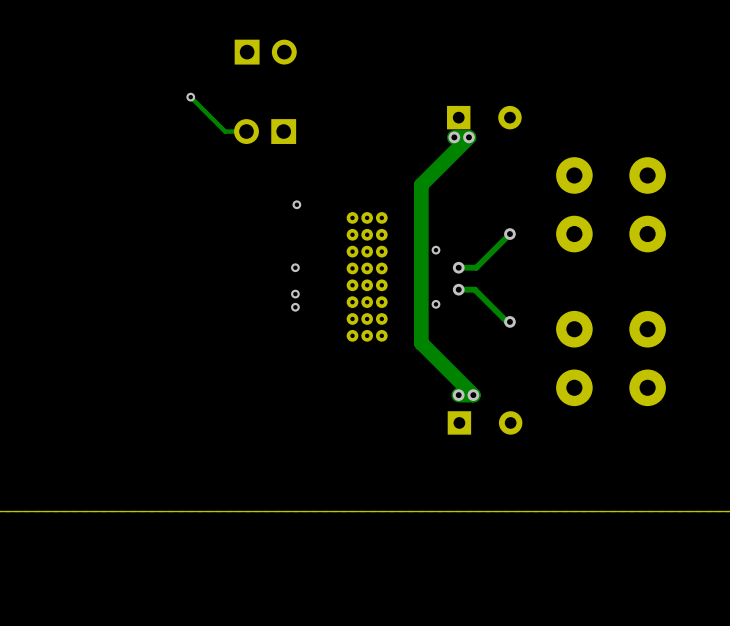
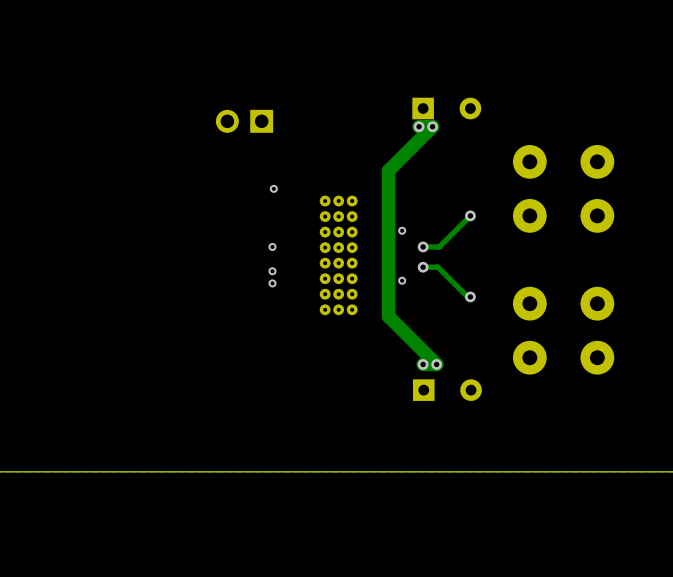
part: (265, 52) -> none
track: (190, 97) (225, 131) (246, 131) -> none
via: (190, 97) -> none

